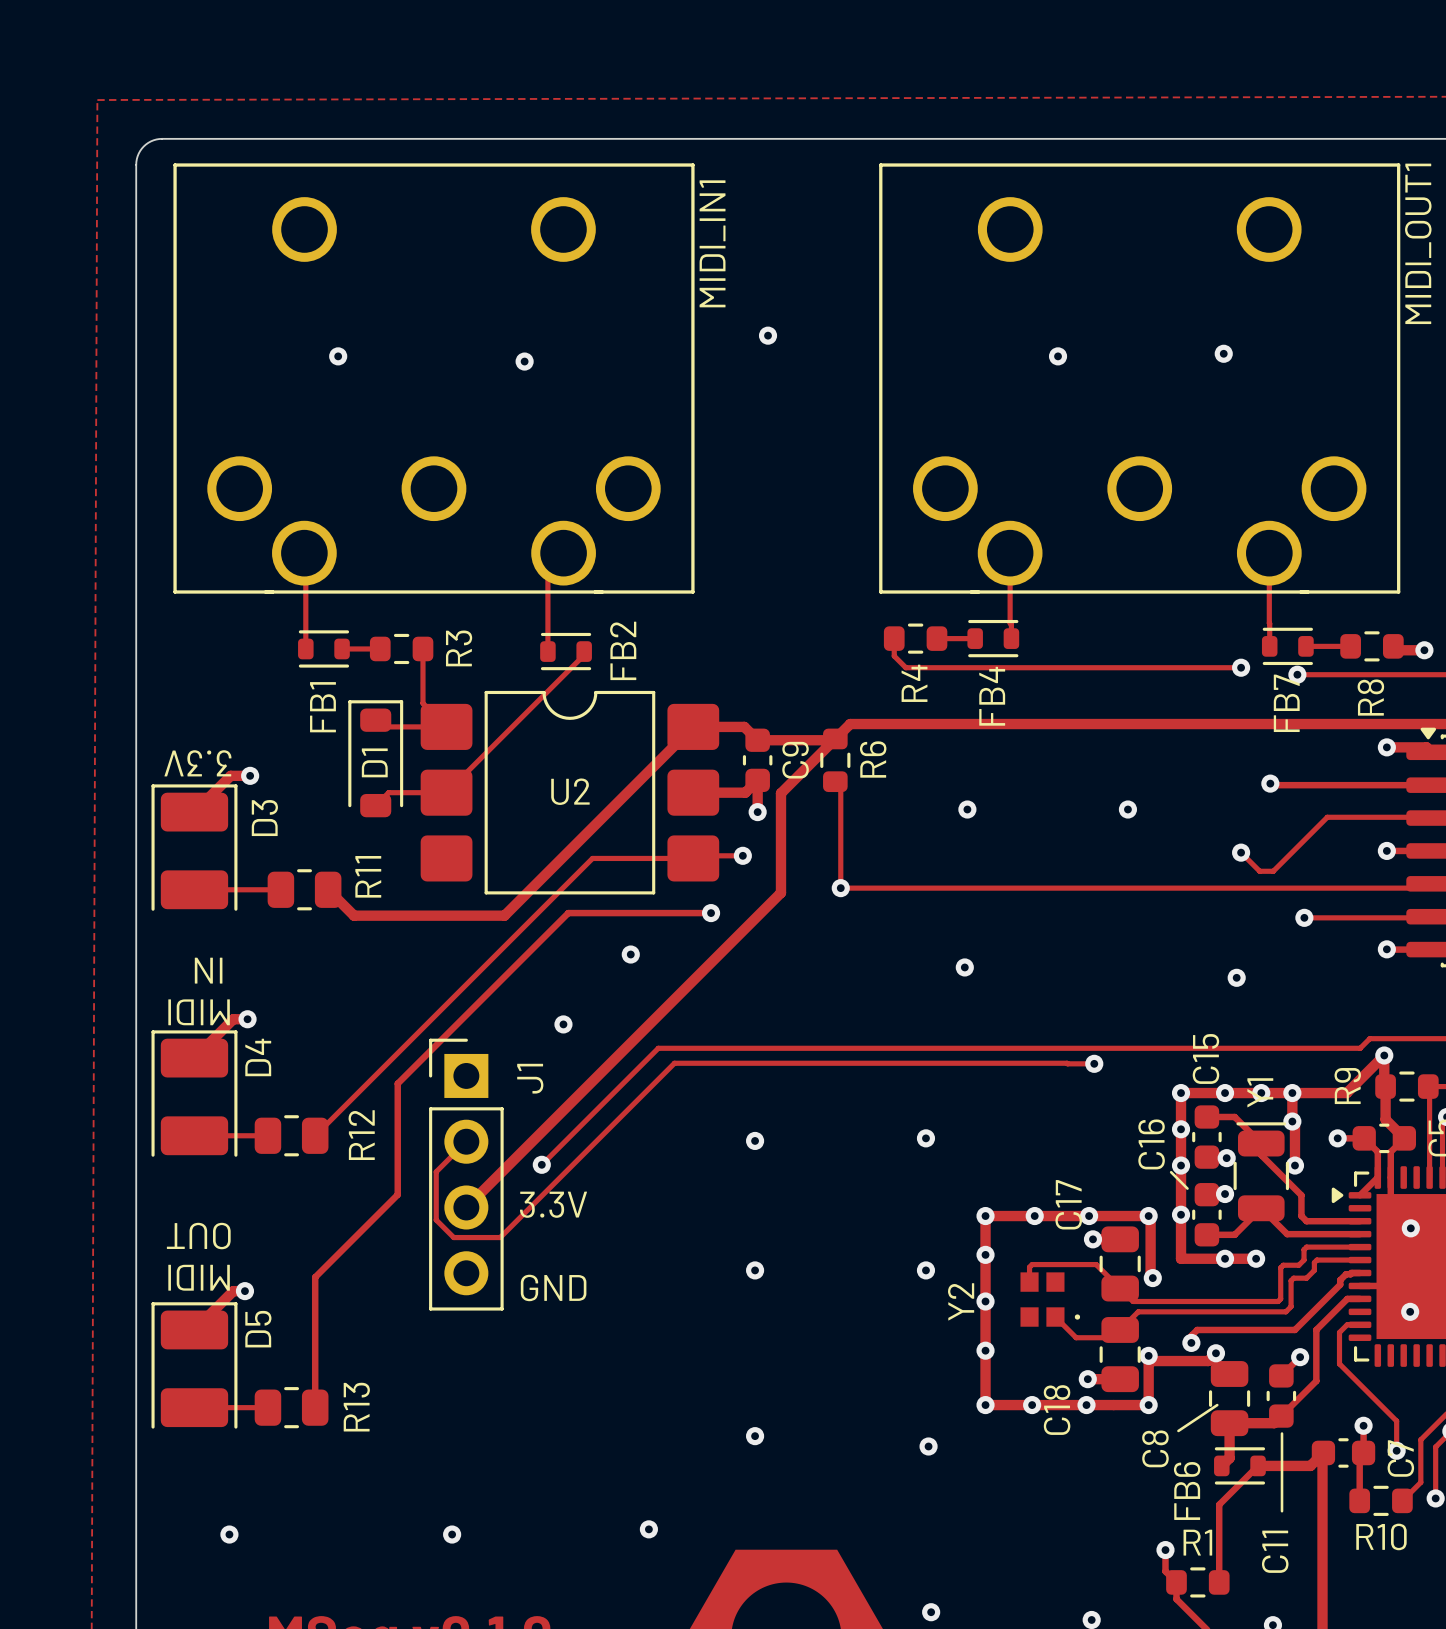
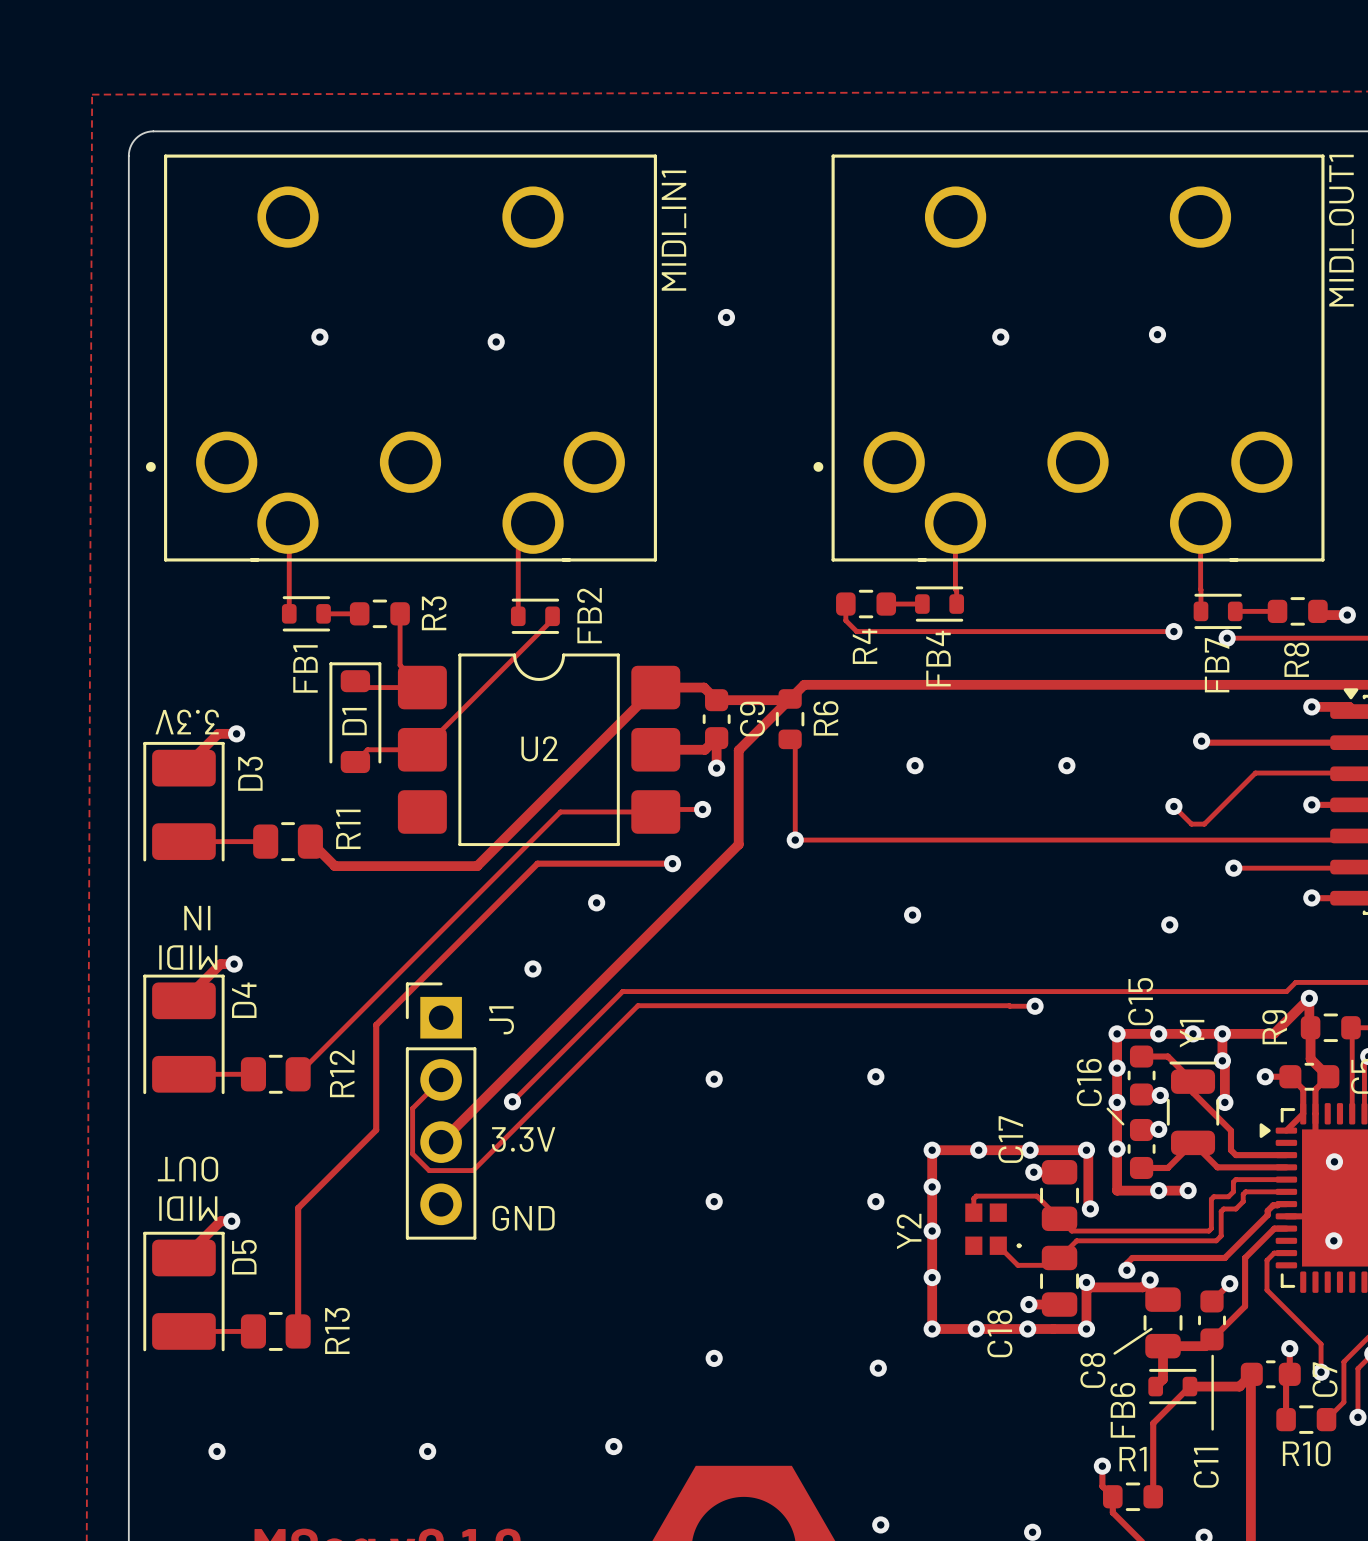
MIDI_IN1 footprint: [173, 163, 695, 594] -> [145, 154, 657, 562]
MIDI_OUT1 footprint: [879, 163, 1401, 594] -> [813, 154, 1325, 562]

